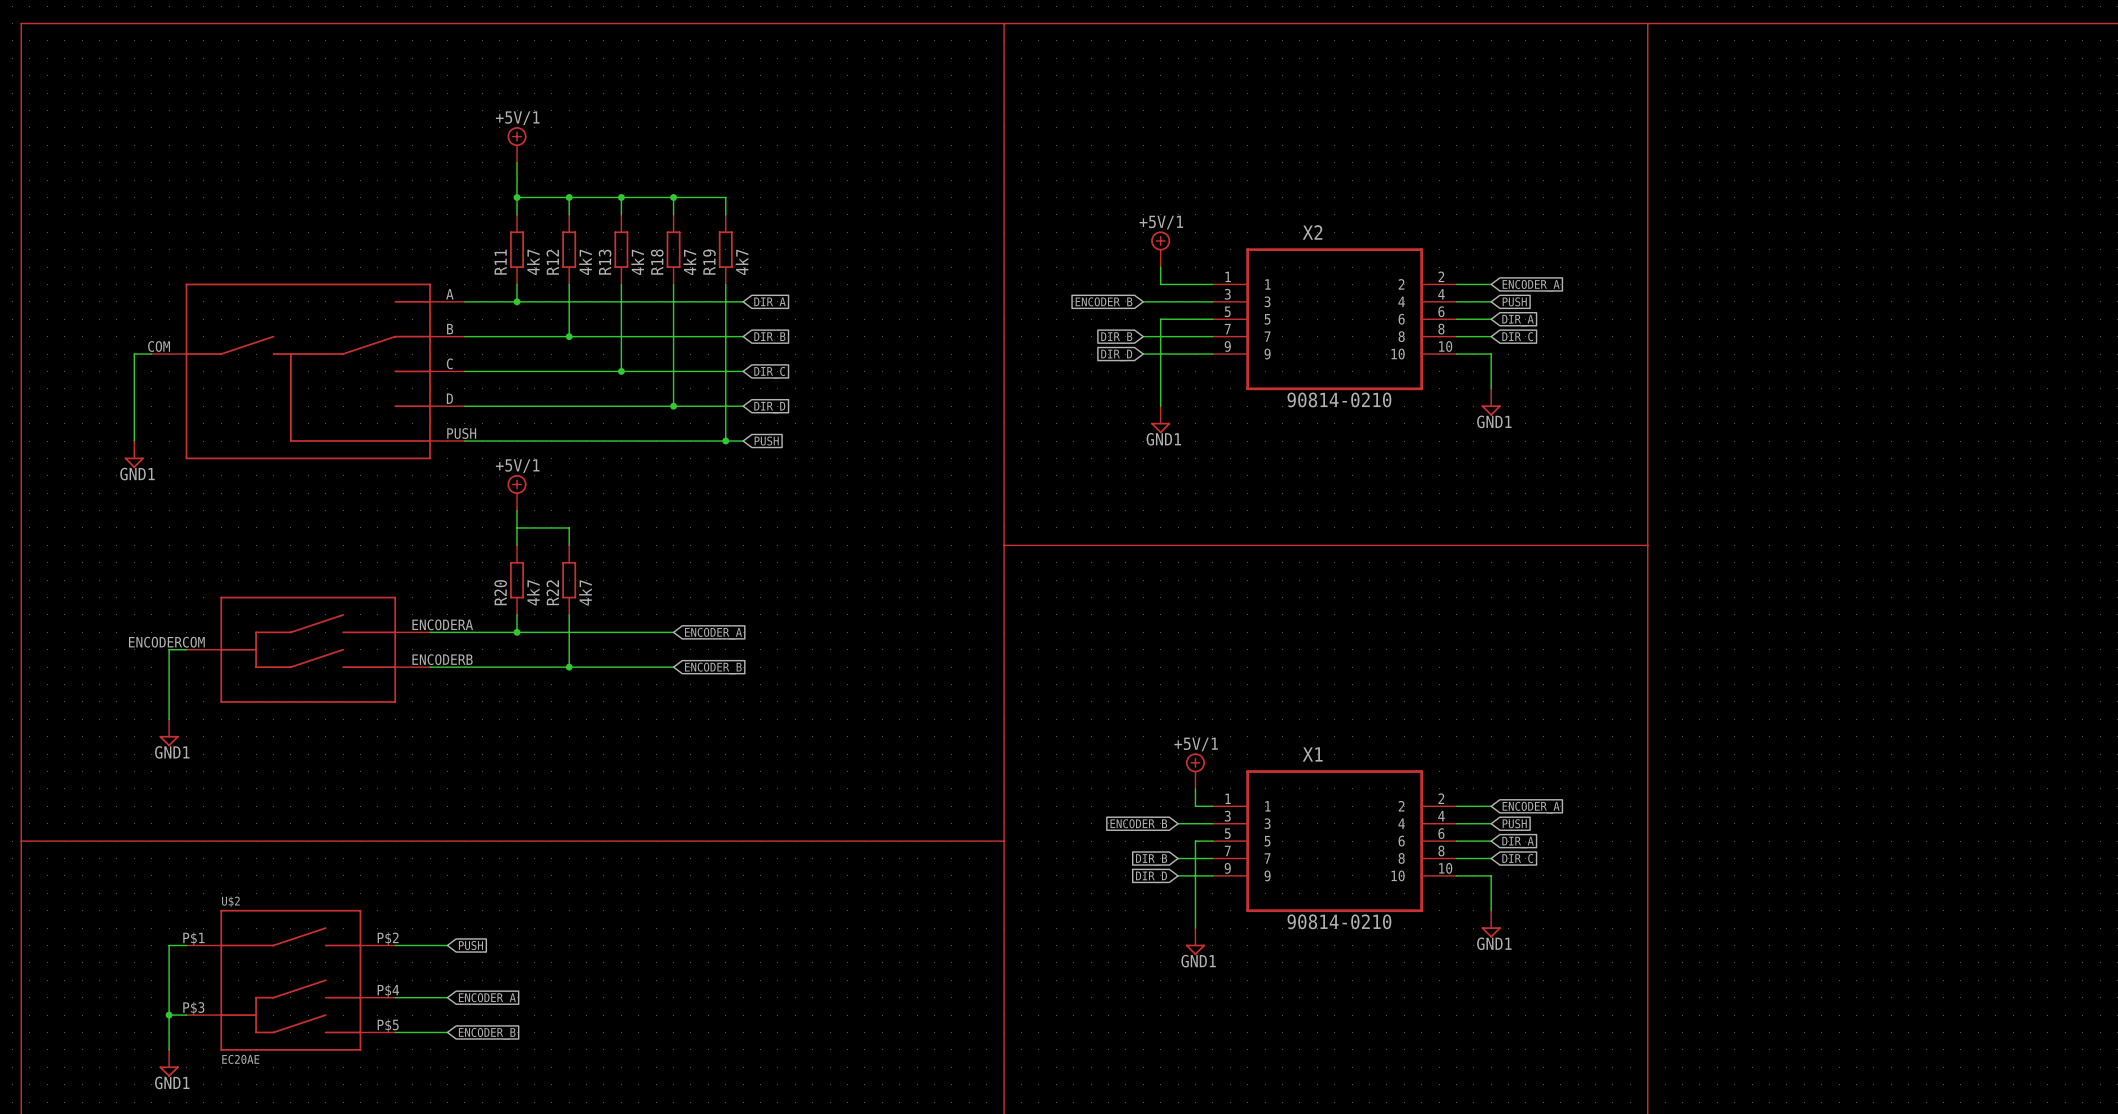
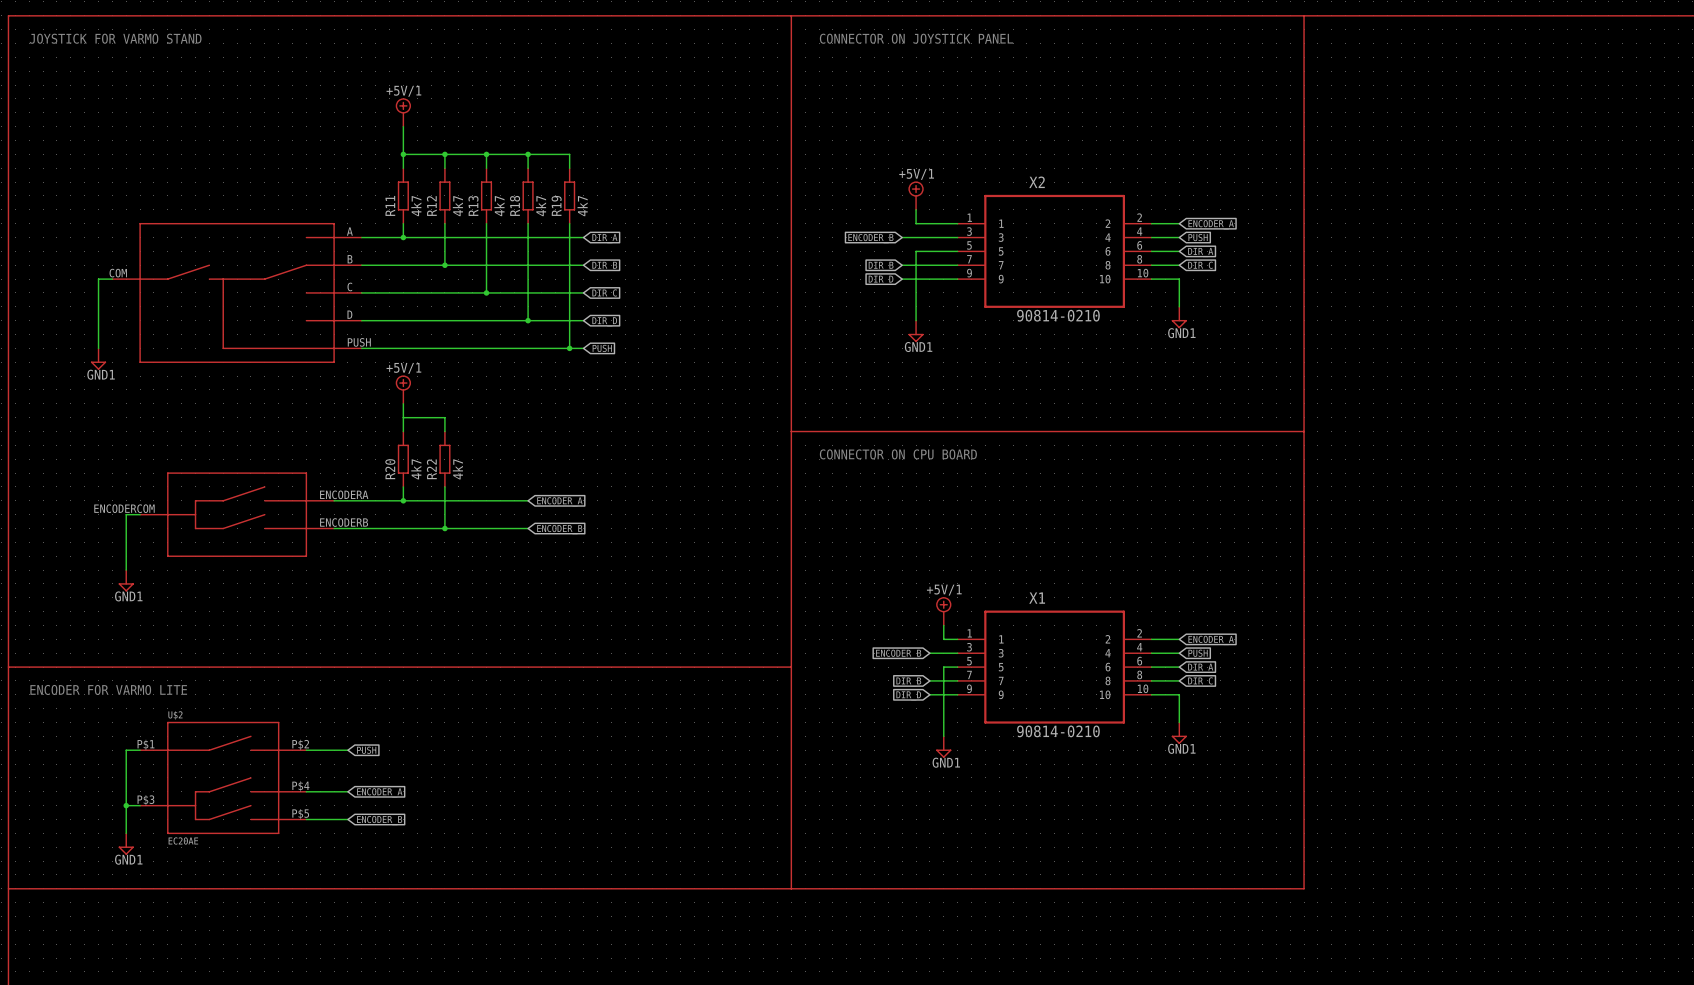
text: none -> JOYSTICK FOR VARMO STAND (115, 38)
text: none -> CONNECTOR ON JOYSTICK PANEL (916, 38)
text: none -> CONNECTOR ON CPU BOARD (898, 454)
text: none -> ENCODER FOR VARMO LITE (108, 689)

